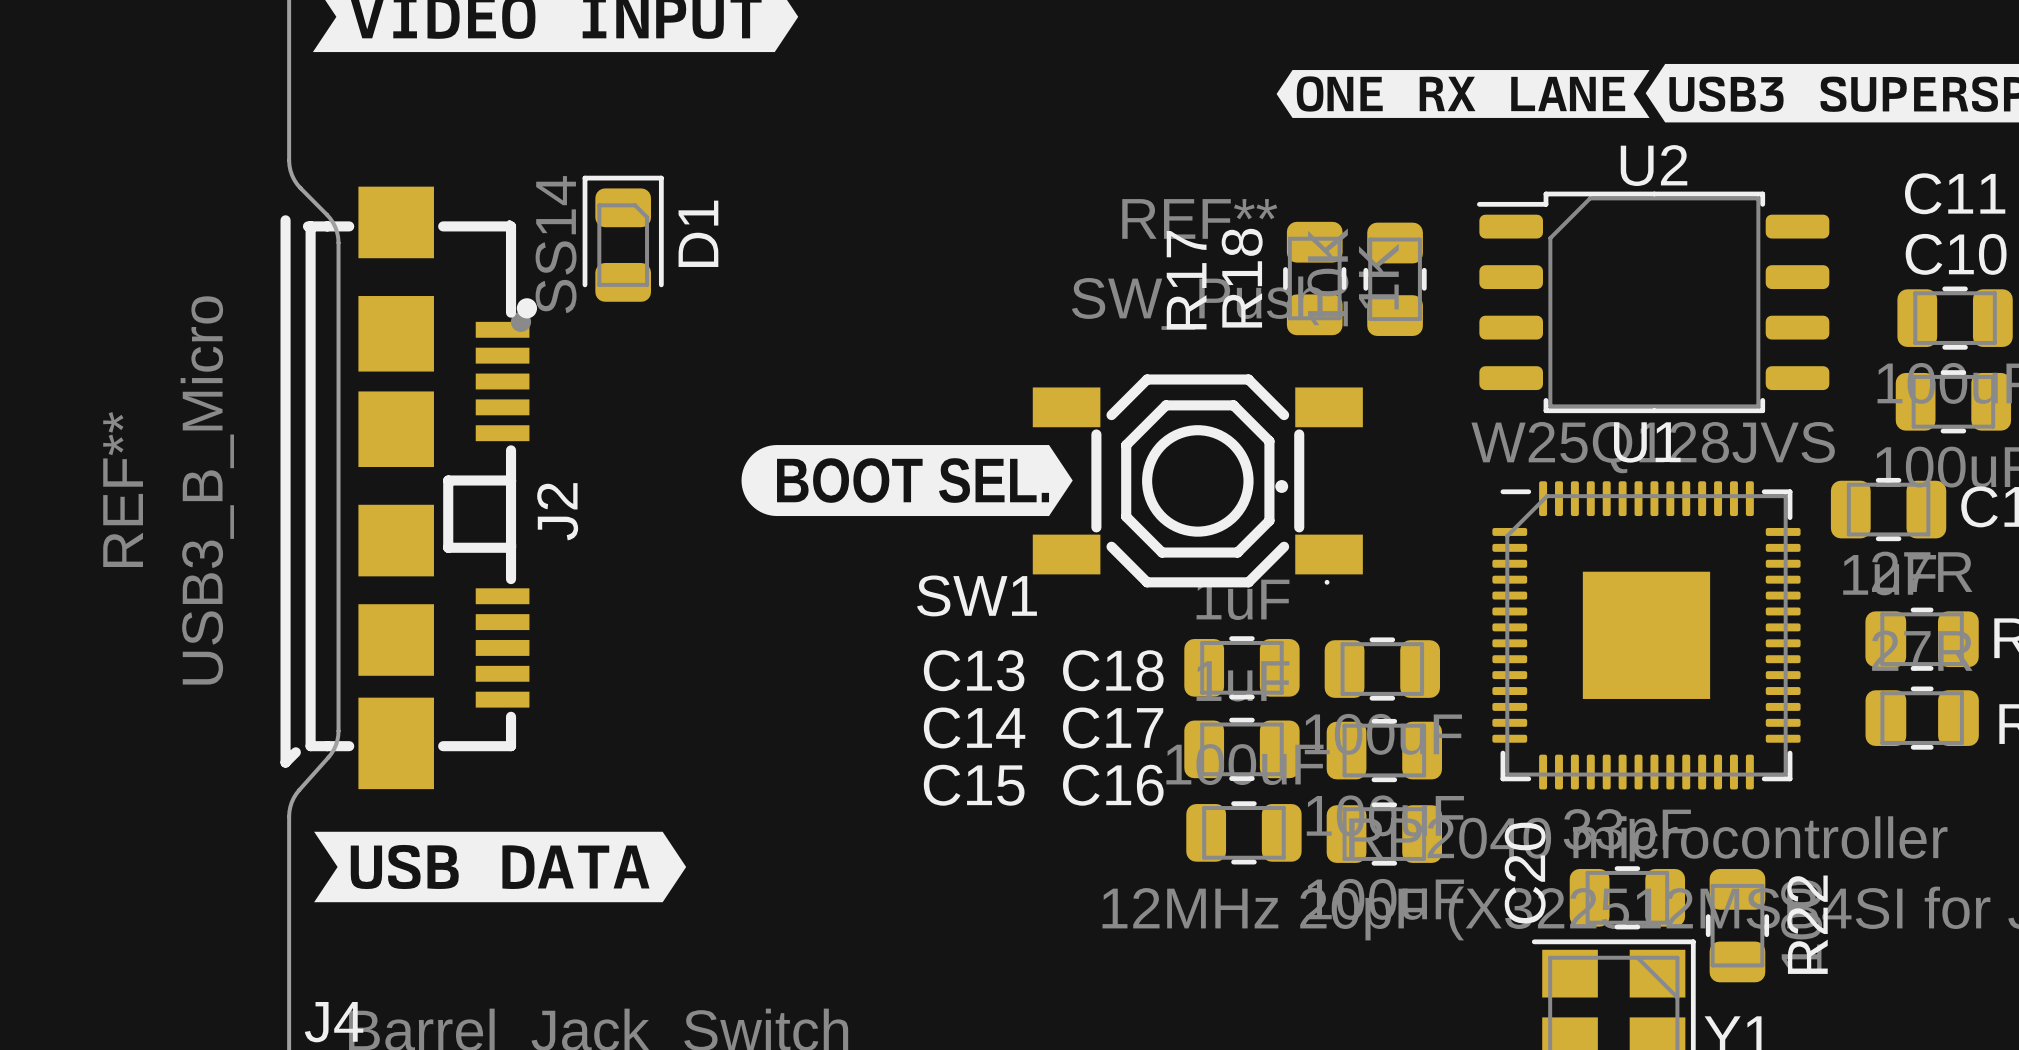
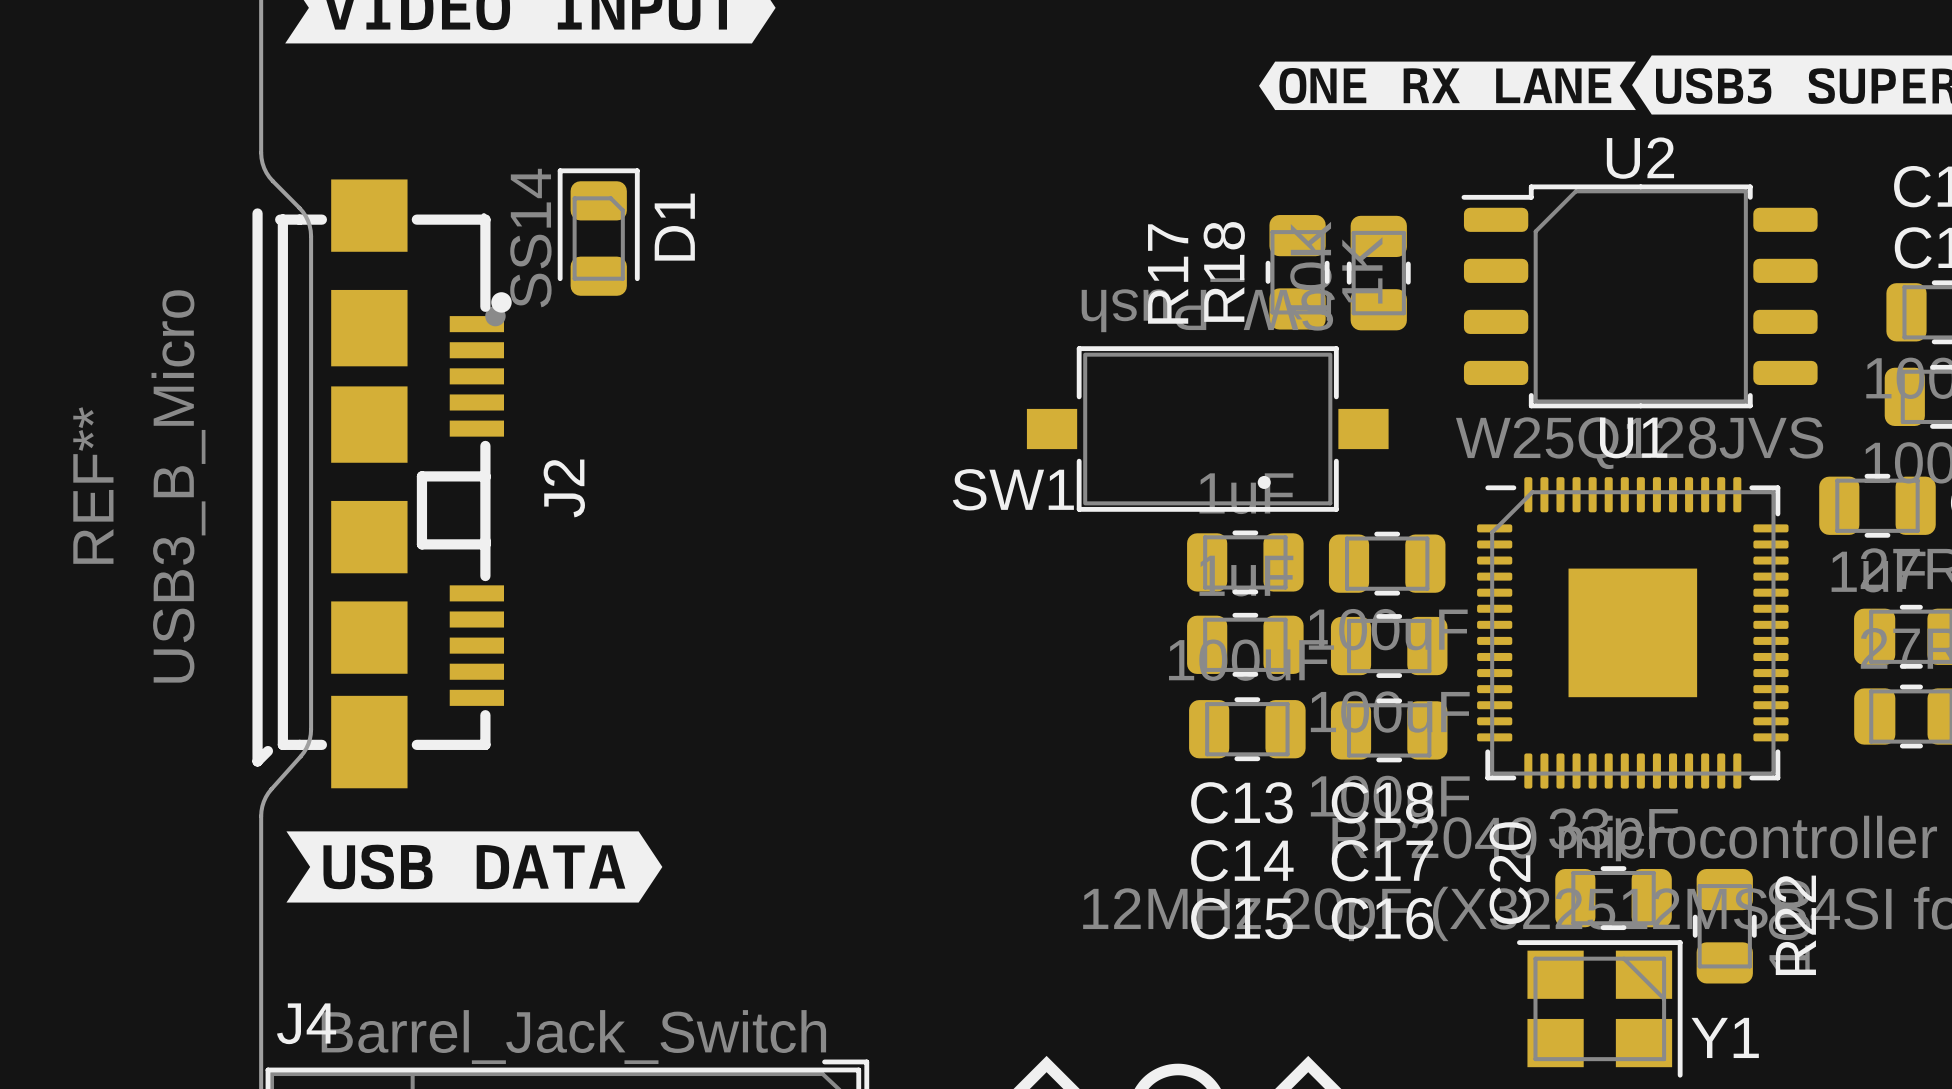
SW1 footprint: [1032, 374, 1363, 588] -> [1026, 346, 1389, 512]
drawing: [741, 445, 1073, 517] -> none
J2 name position: J2 (557, 511) -> J2 (564, 488)
C13 position: (1241, 667) -> (1245, 562)
C18 position: (1382, 669) -> (1387, 563)
C13 name position: C13 (974, 670) -> C13 (1241, 802)
C18 name position: C18 (1113, 670) -> C18 (1382, 802)
C14 name position: C14 (974, 727) -> C14 (1242, 860)
C17 name position: C17 (1113, 727) -> C17 (1382, 860)
C14 position: (1241, 749) -> (1245, 644)
C17 position: (1384, 750) -> (1389, 646)
C15 name position: C15 (974, 785) -> C15 (1241, 918)
C16 name position: C16 (1113, 785) -> C16 (1382, 918)
C15 position: (1243, 832) -> (1247, 729)
C16 position: (1384, 834) -> (1389, 730)

